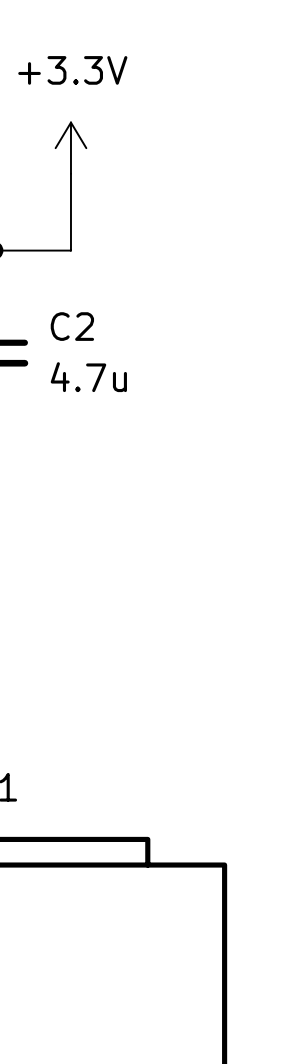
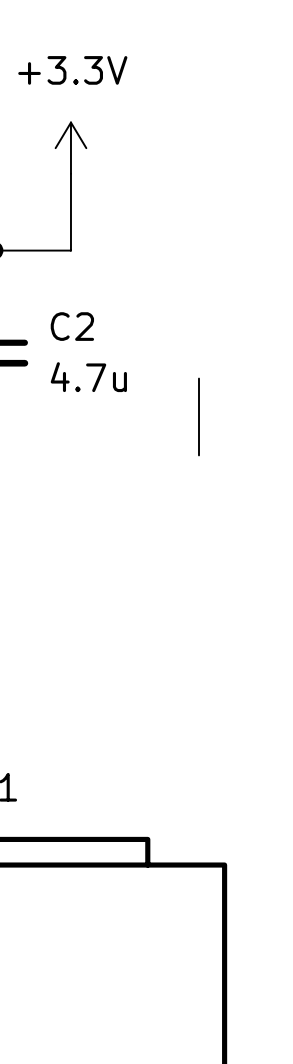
wire: none -> (198, 378) (198, 455)

